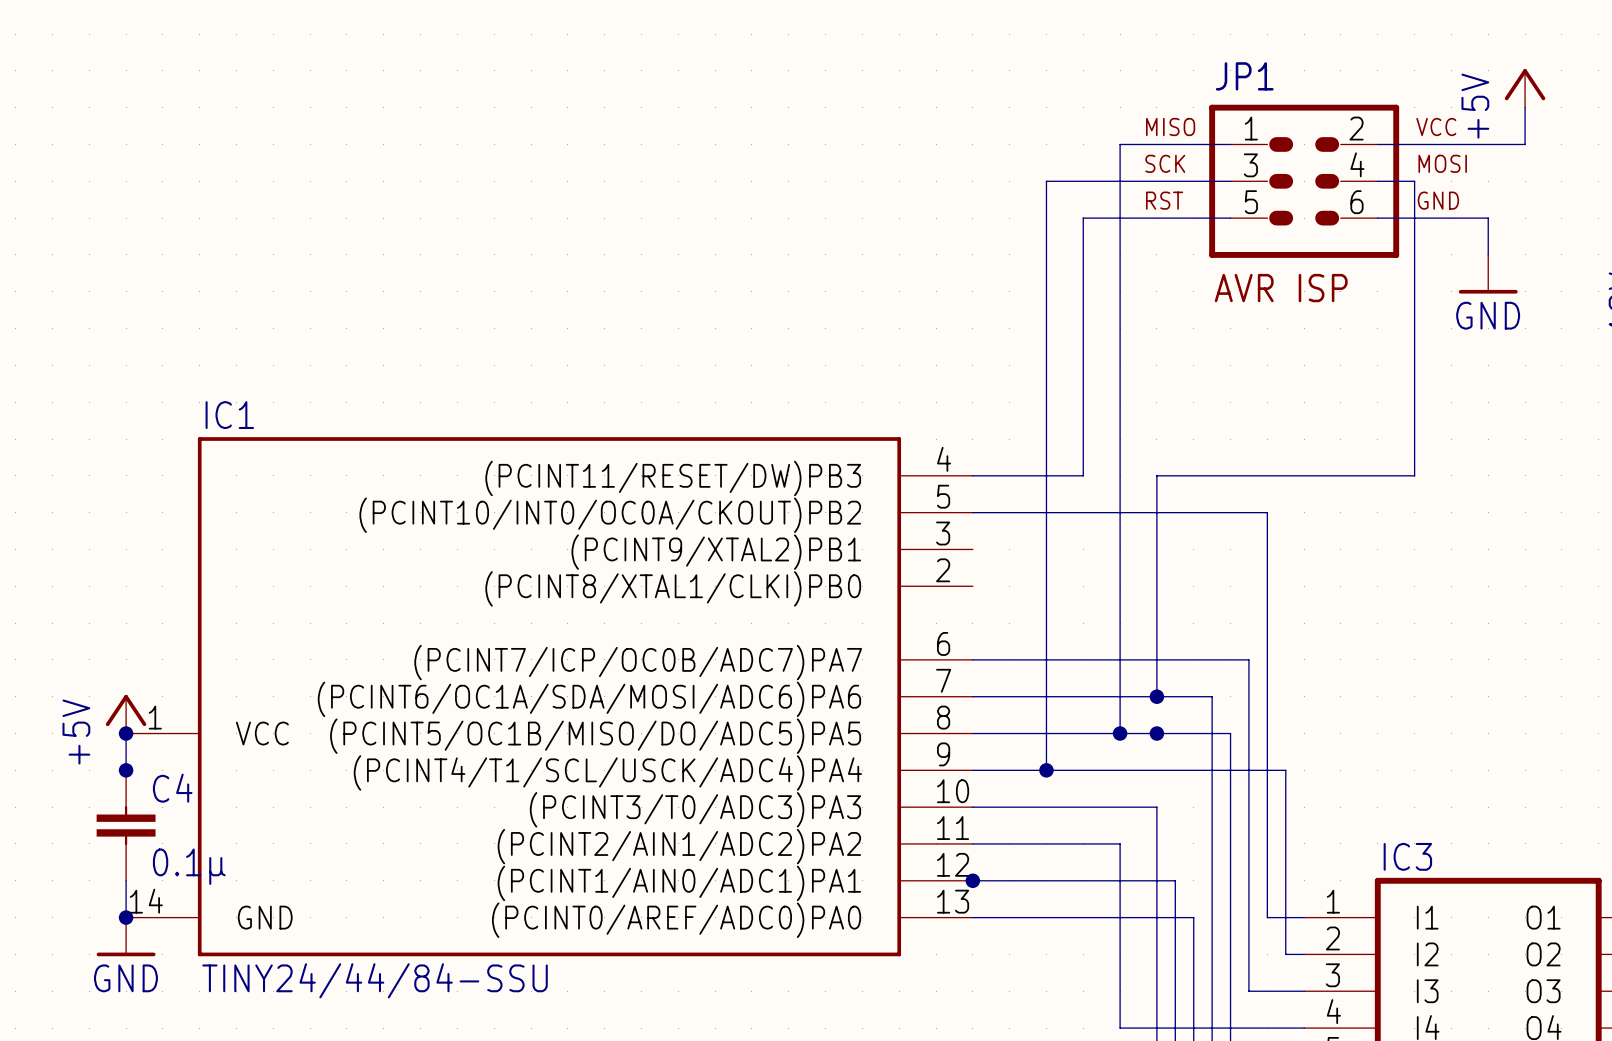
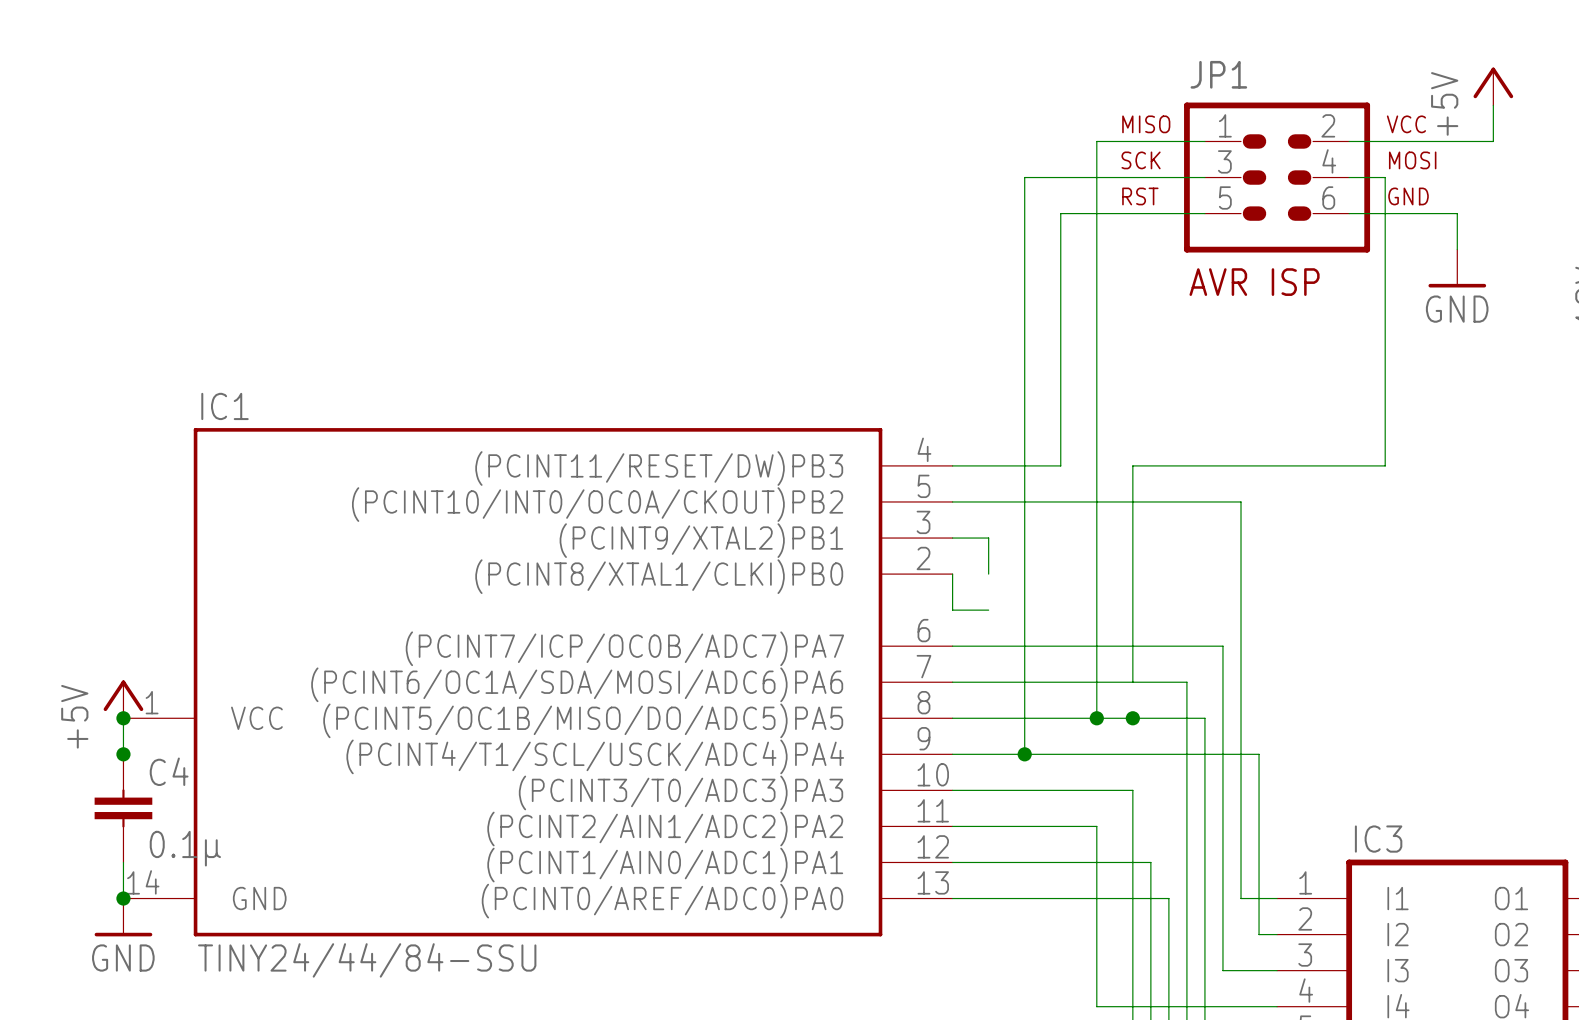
wire: none -> (952, 538) (988, 538) (988, 574)
wire: none -> (952, 574) (952, 610) (988, 610)
junction: (1156, 696) -> none
junction: (972, 880) -> none

